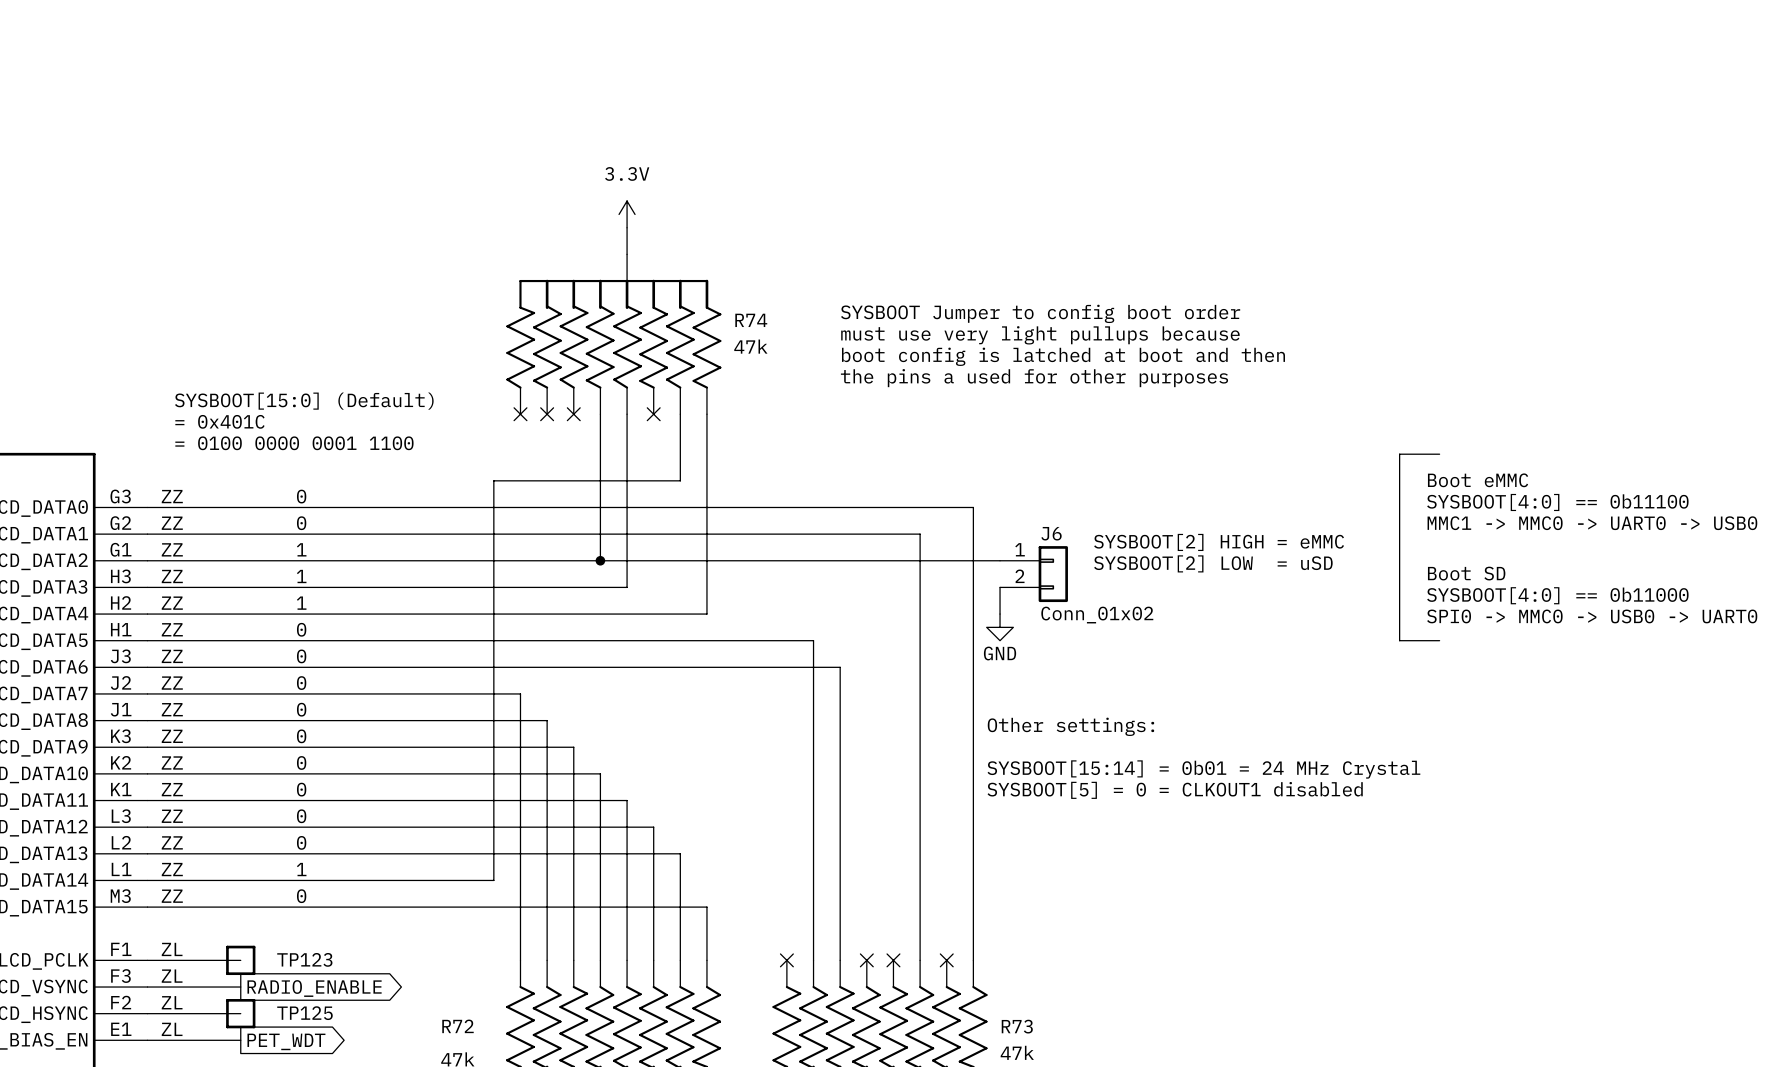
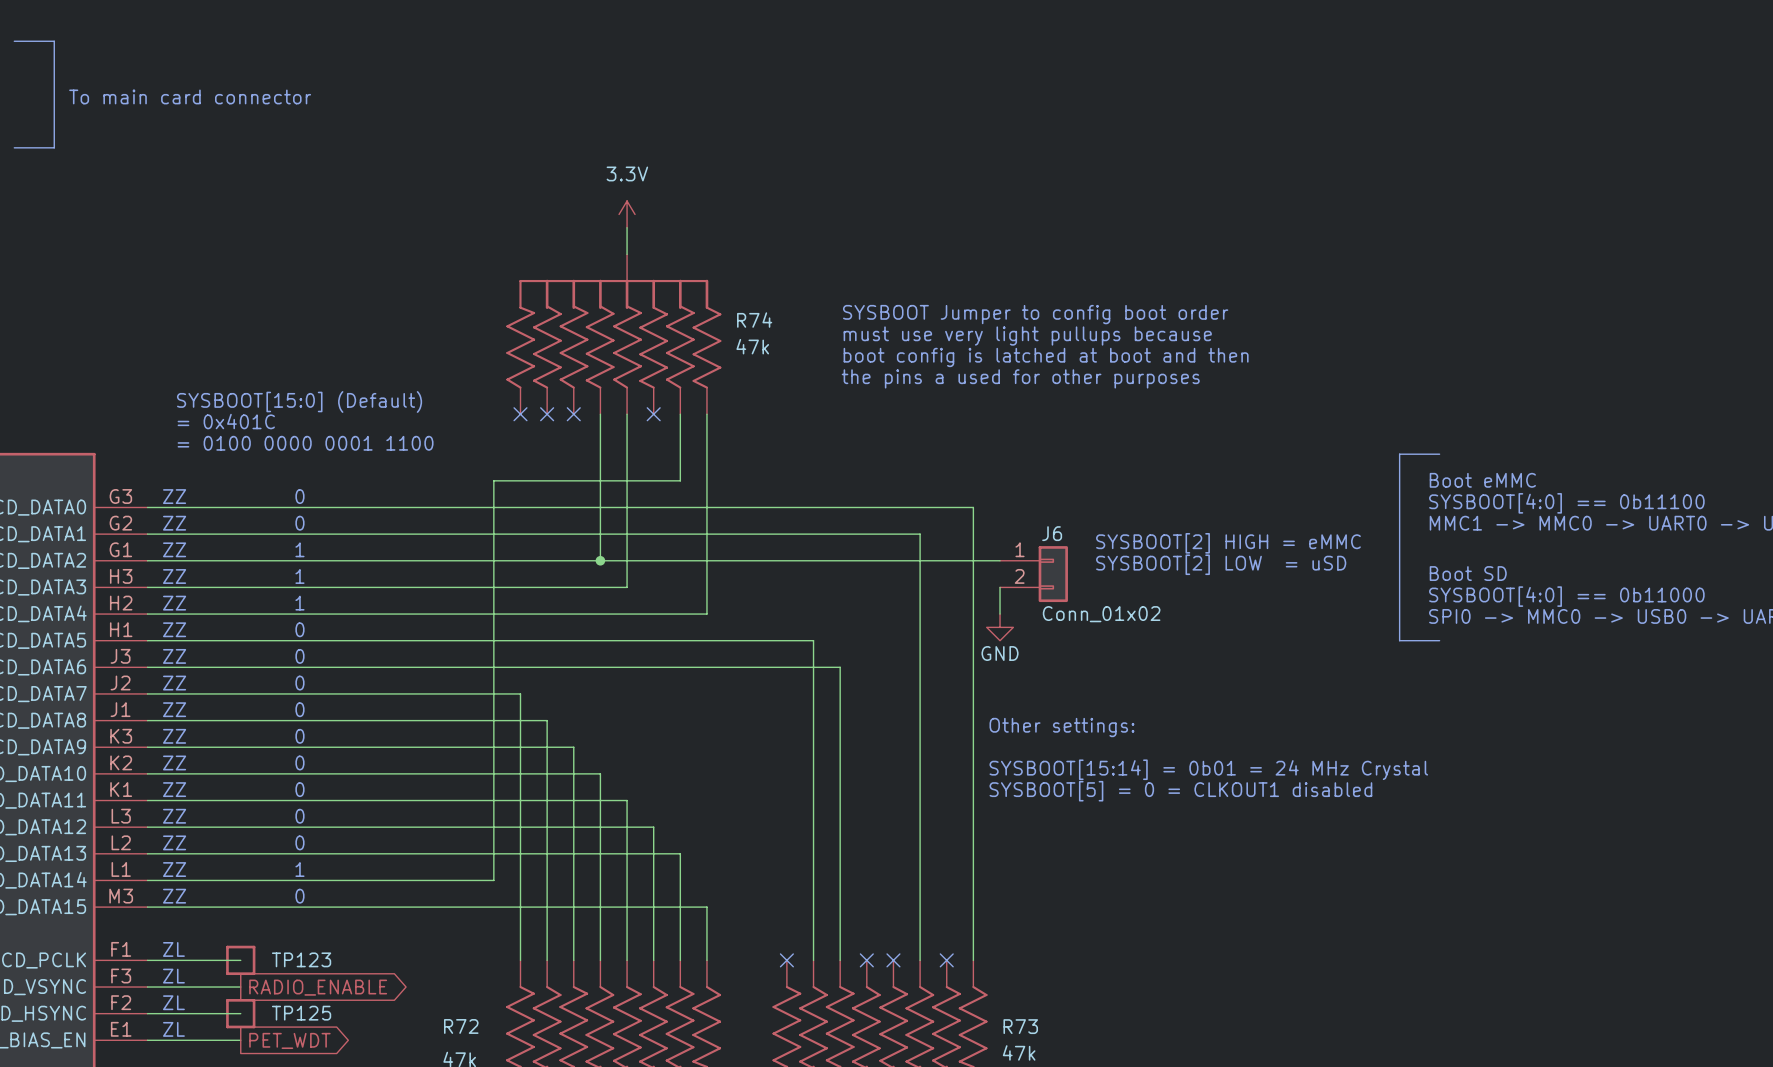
line: none -> (14, 41) (54, 41) (54, 147) (14, 147)
text: none -> To main card connector (190, 96)

